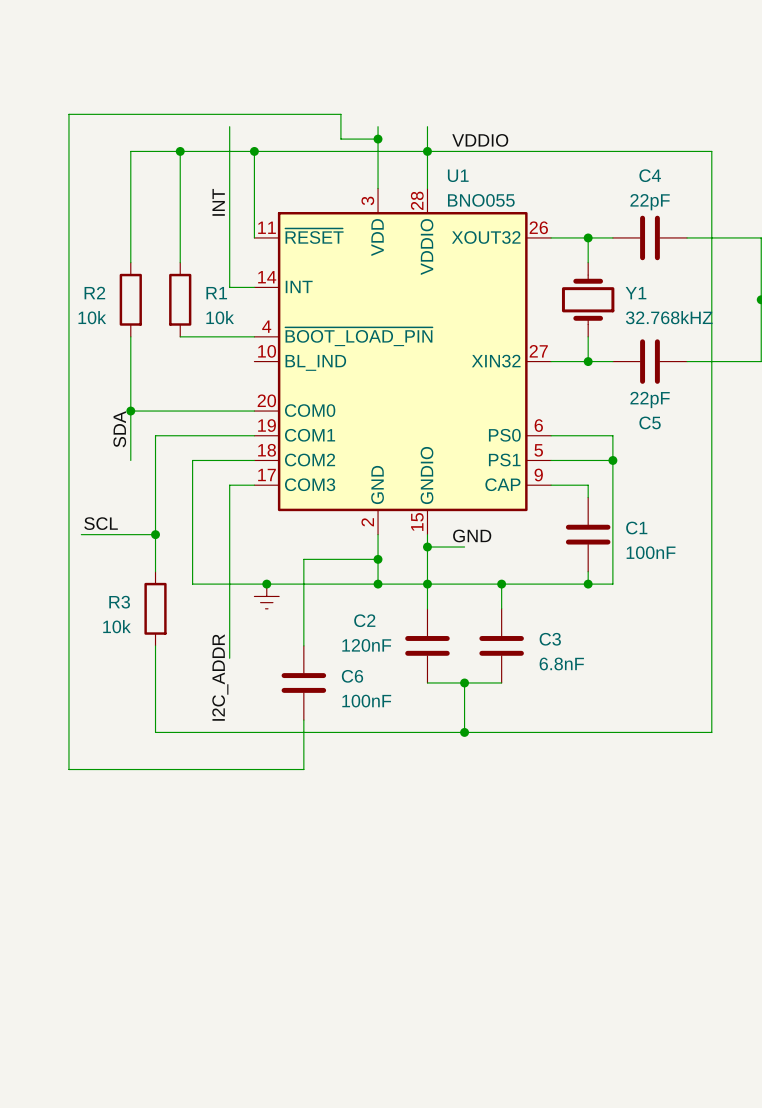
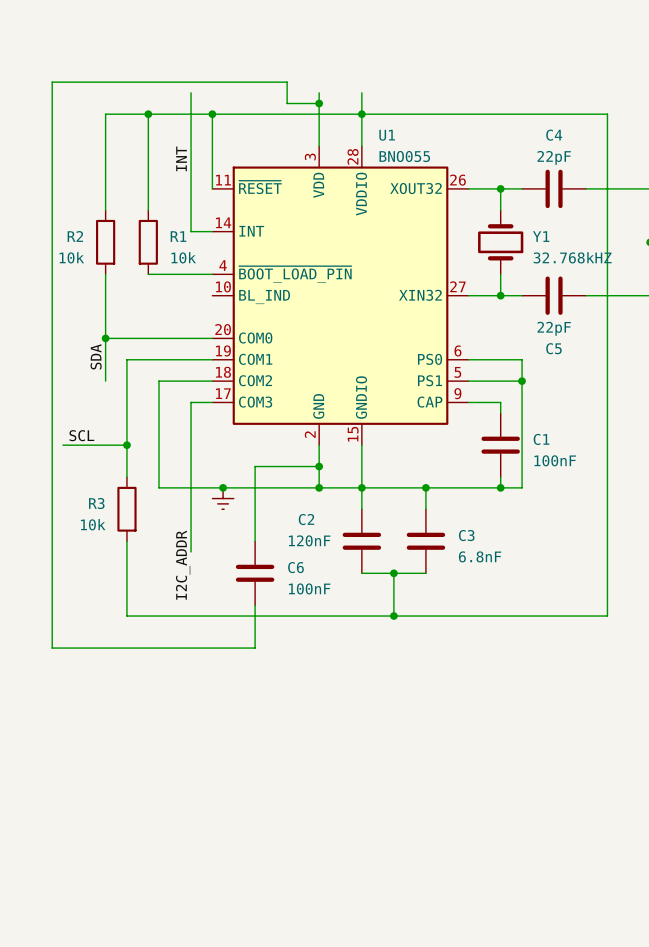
label: VDDIO (480, 140) -> none
label: GND (472, 535) -> none
wire: (427, 547) (464, 547) -> none
junction: (427, 547) -> none

